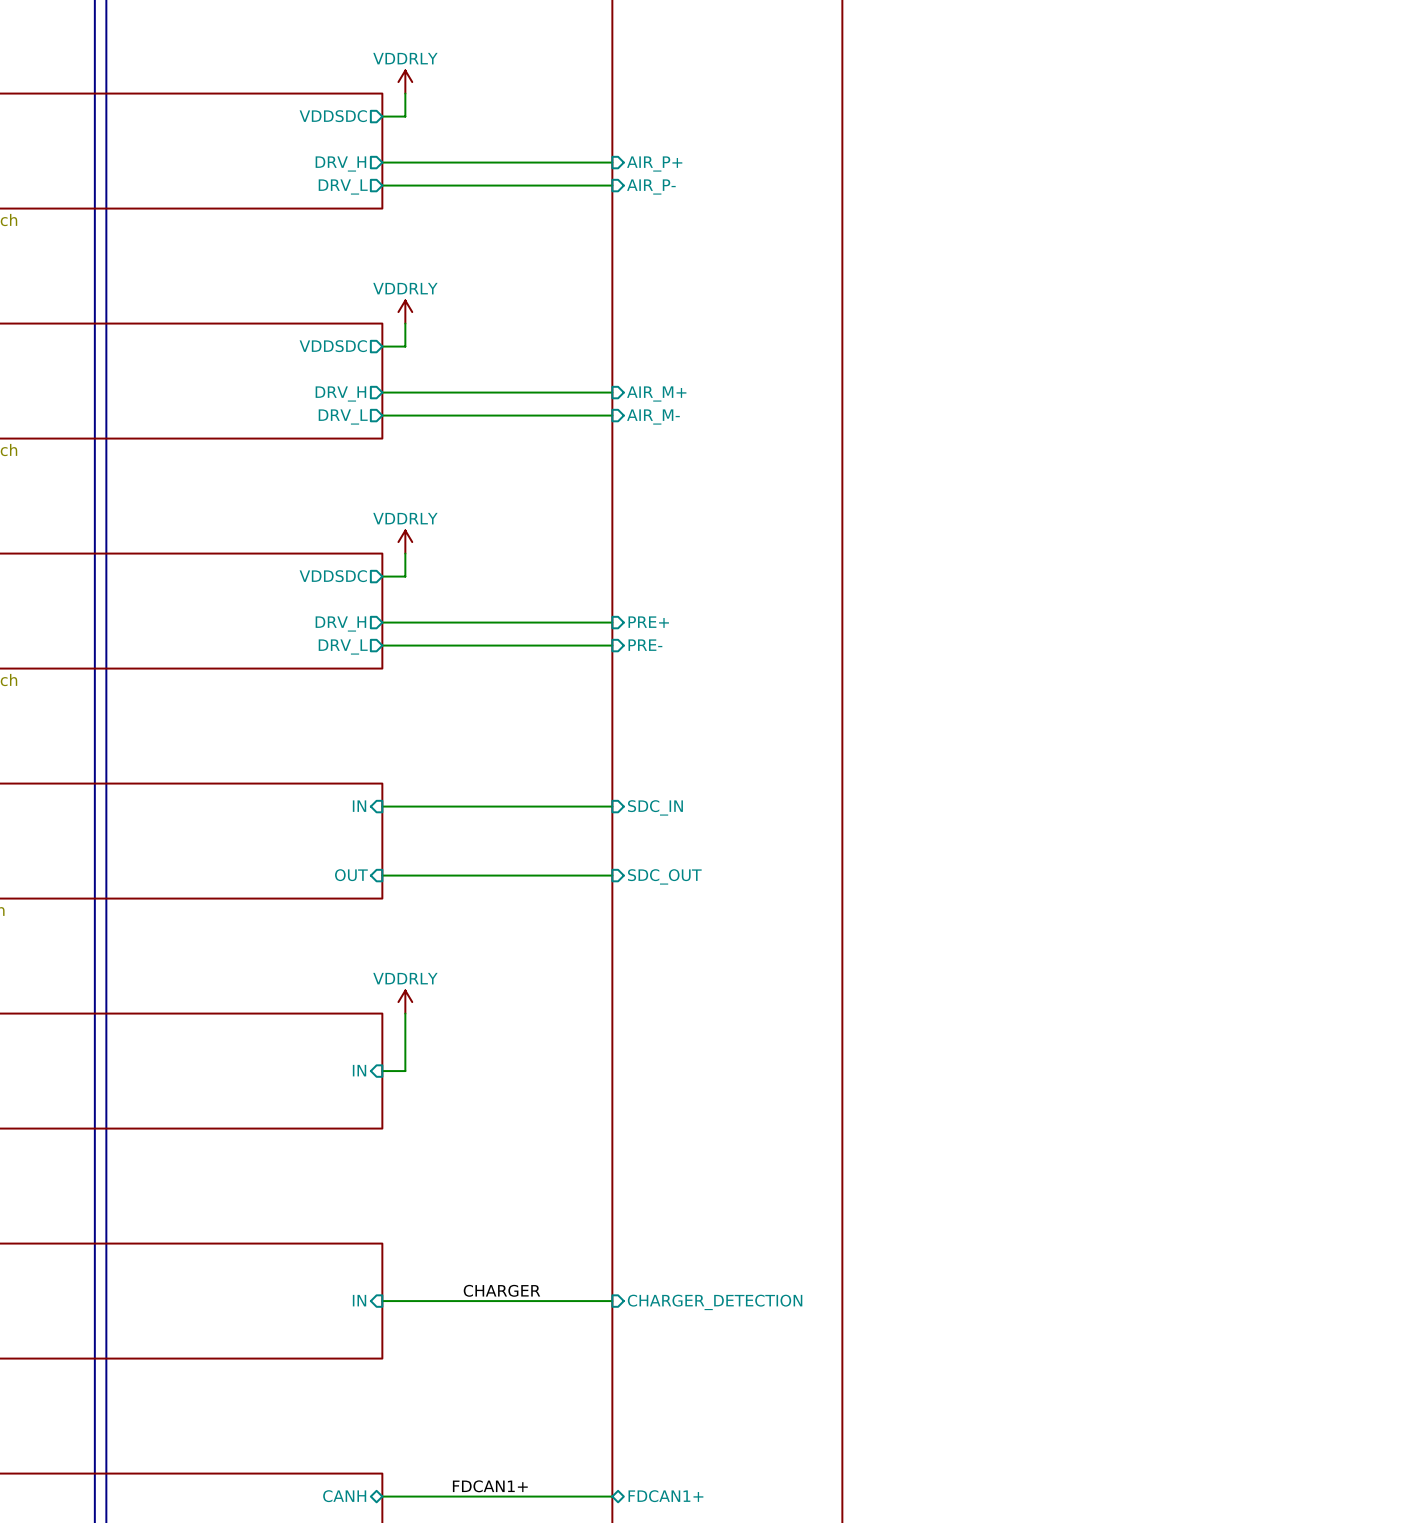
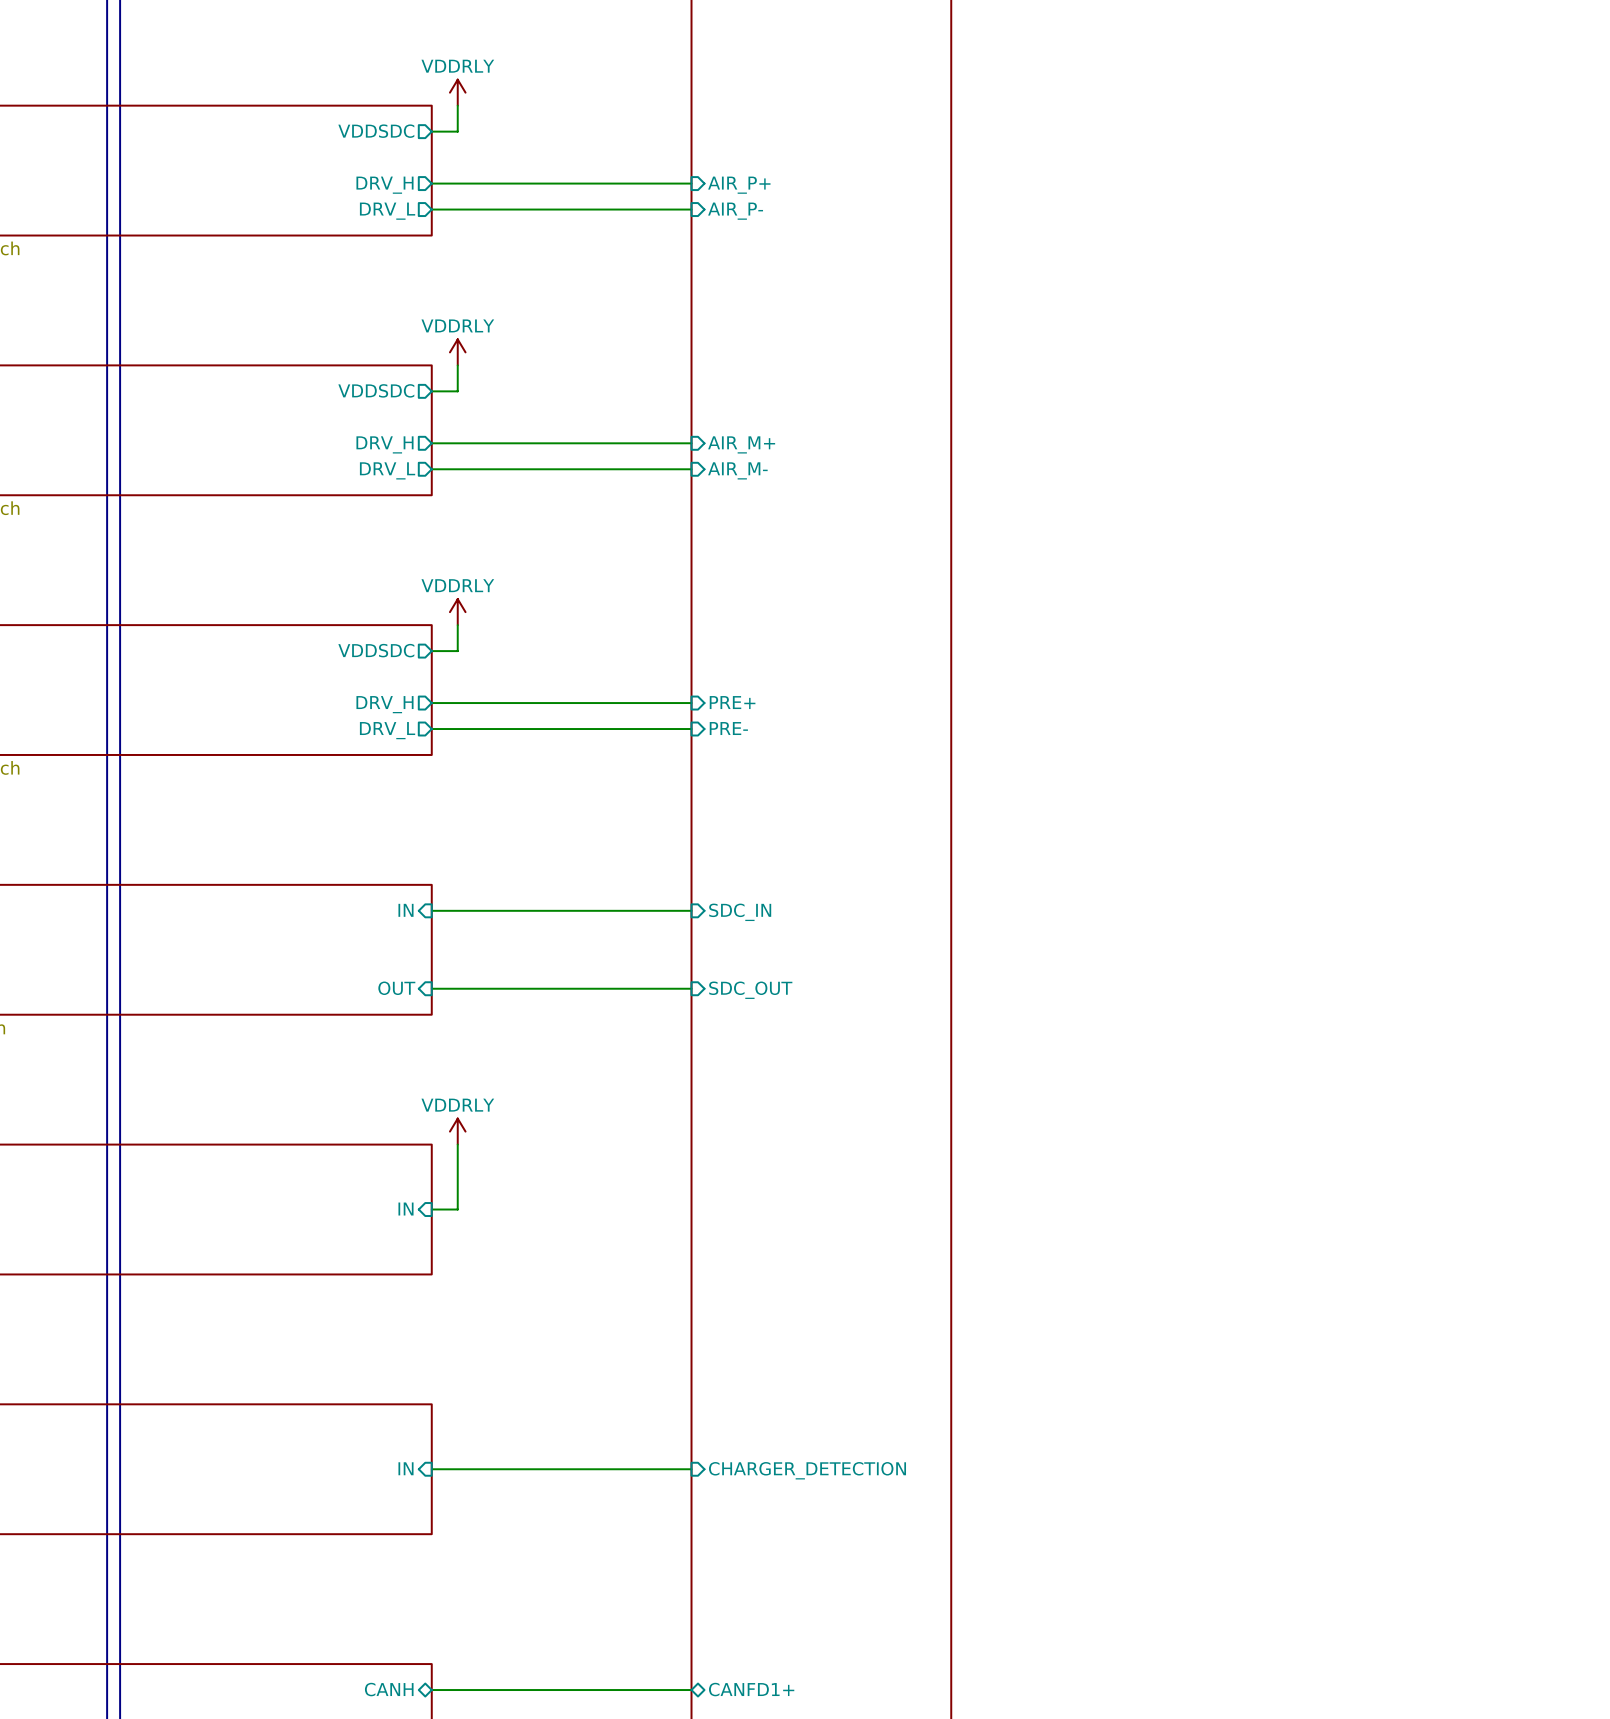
label: CHARGER (501, 1290) -> none
label: FDCAN1+ (490, 1486) -> none
sheet pin: FDCAN1+ (665, 1496) -> CANFD1+ (751, 1689)

